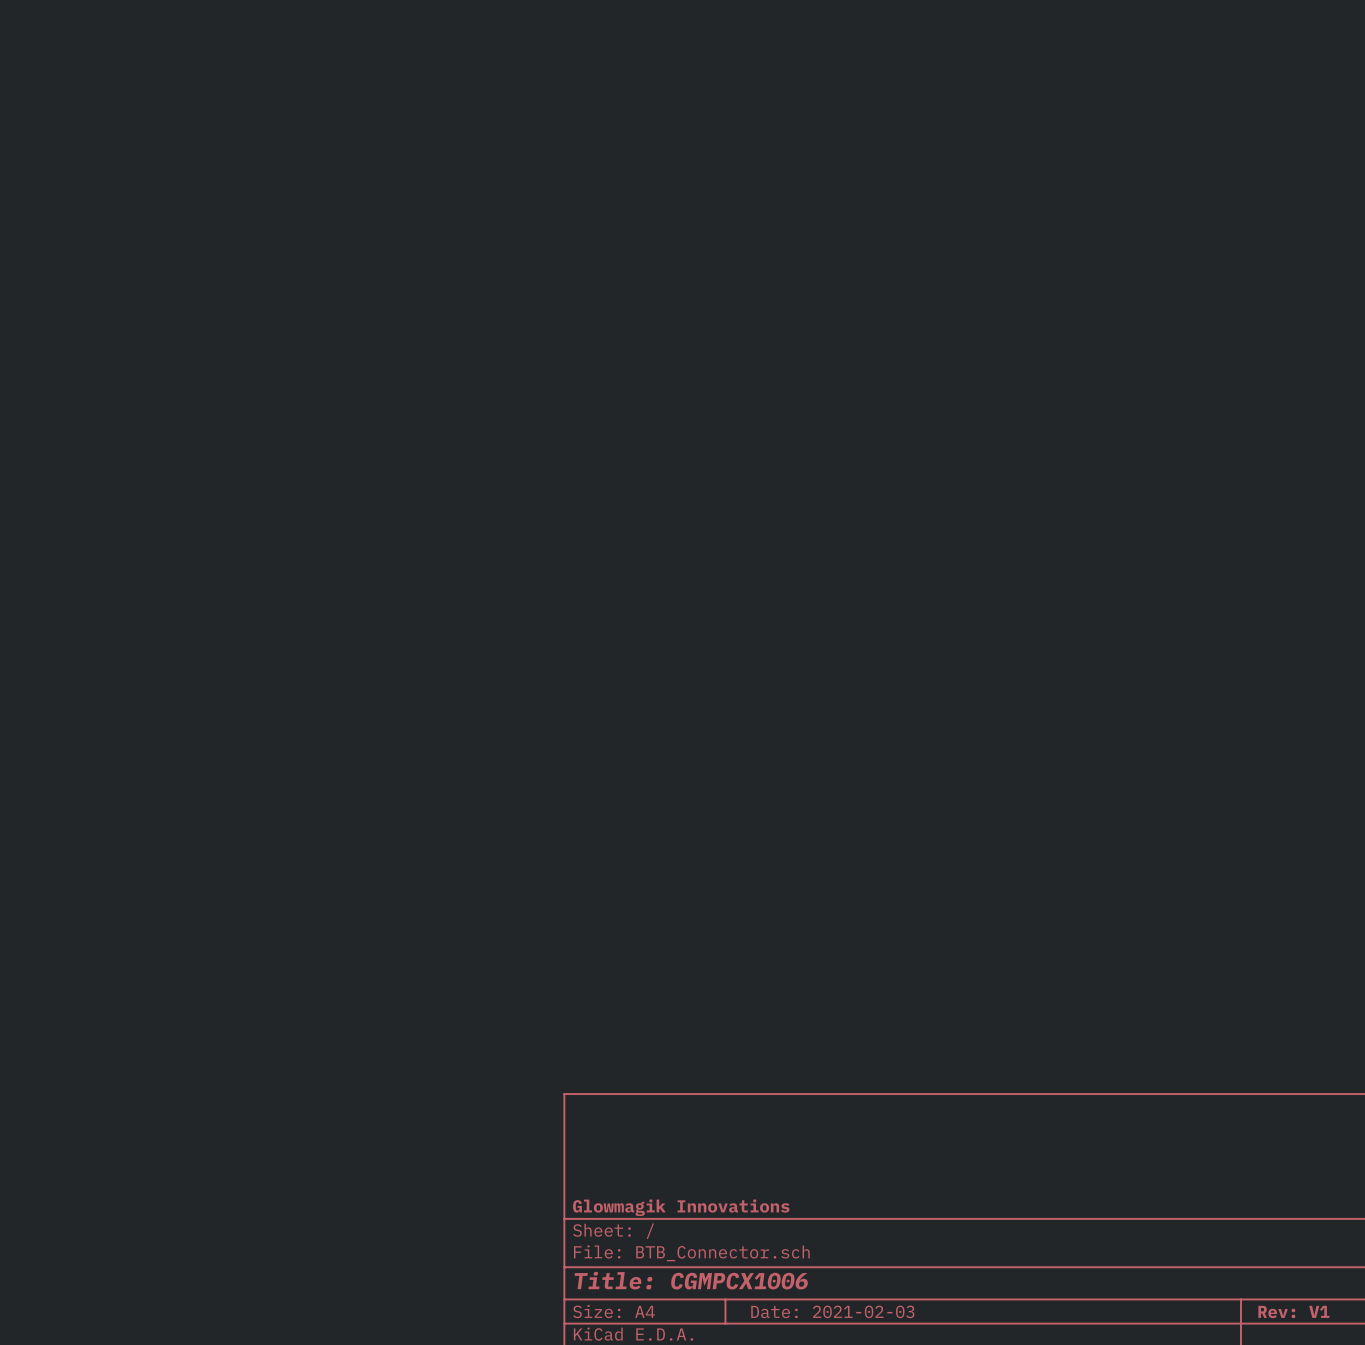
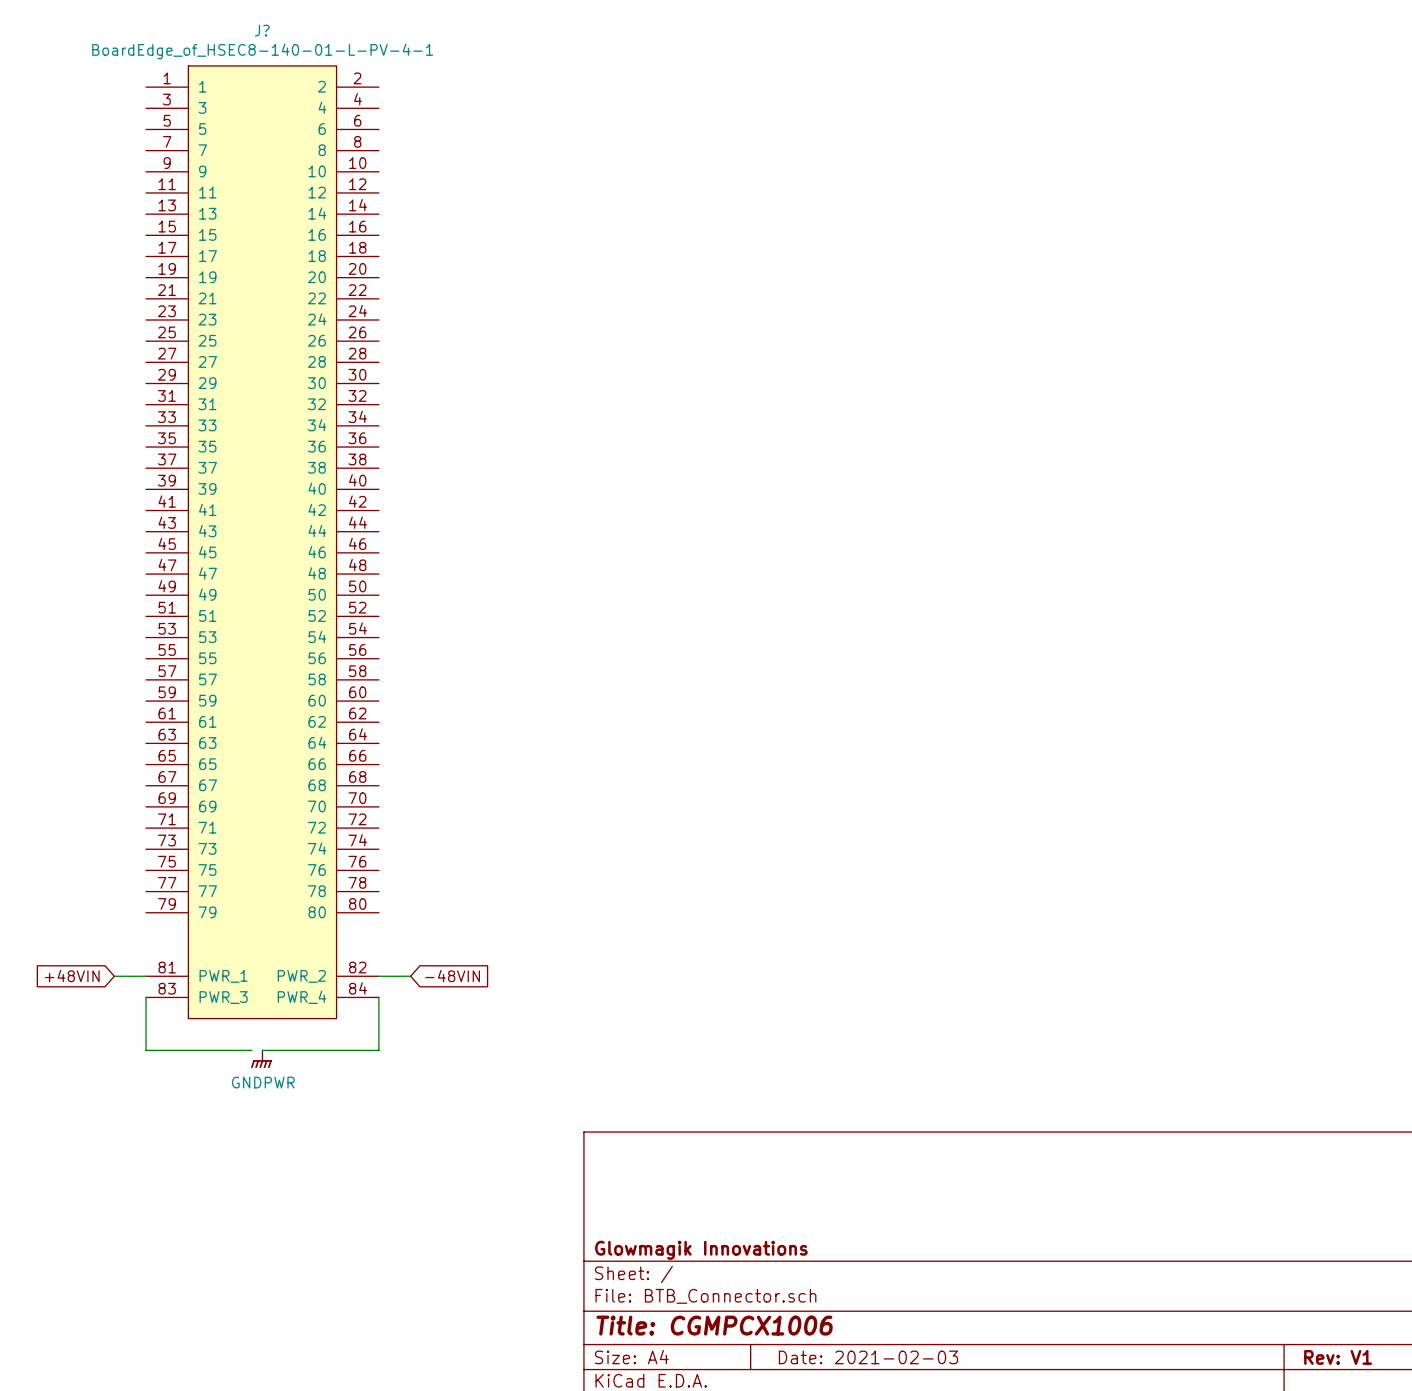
J?: none -> BoardEdge_of_HSEC8-140-01-L-PV-4-1 (262, 542)
global label: none -> +48VIN (72, 976)
wire: none -> (114, 976) (146, 976)
wire: none -> (378, 976) (410, 976)
global label: none -> -48VIN (452, 976)
wire: none -> (146, 997) (146, 1050) (251, 1050)
wire: none -> (378, 997) (378, 1050) (262, 1050)
power symbol: none -> GNDPWR (261, 1059)

